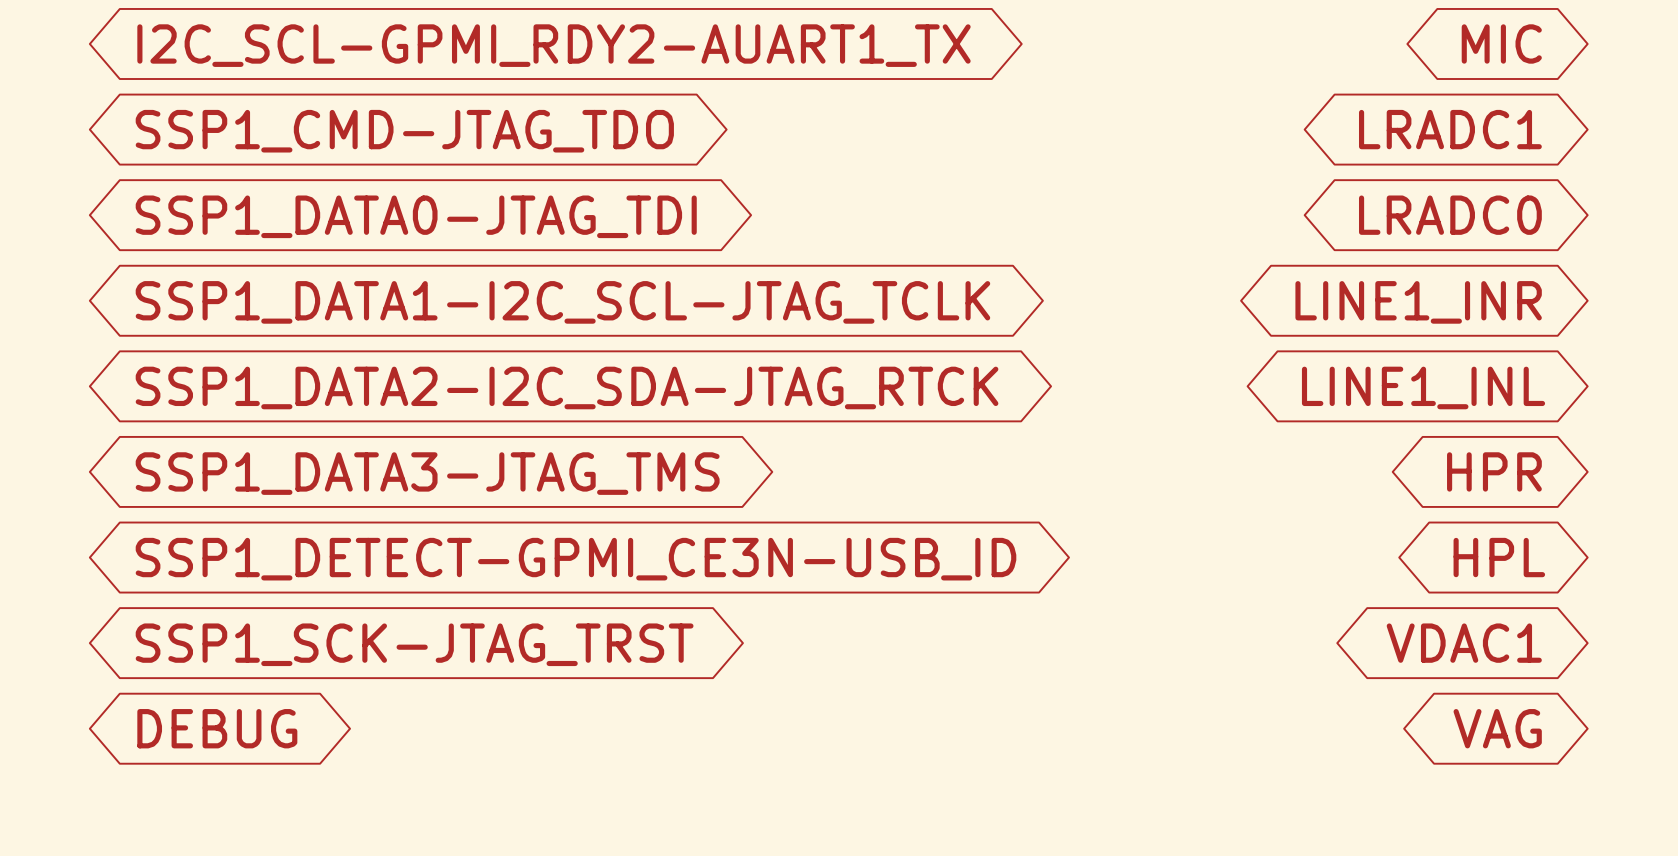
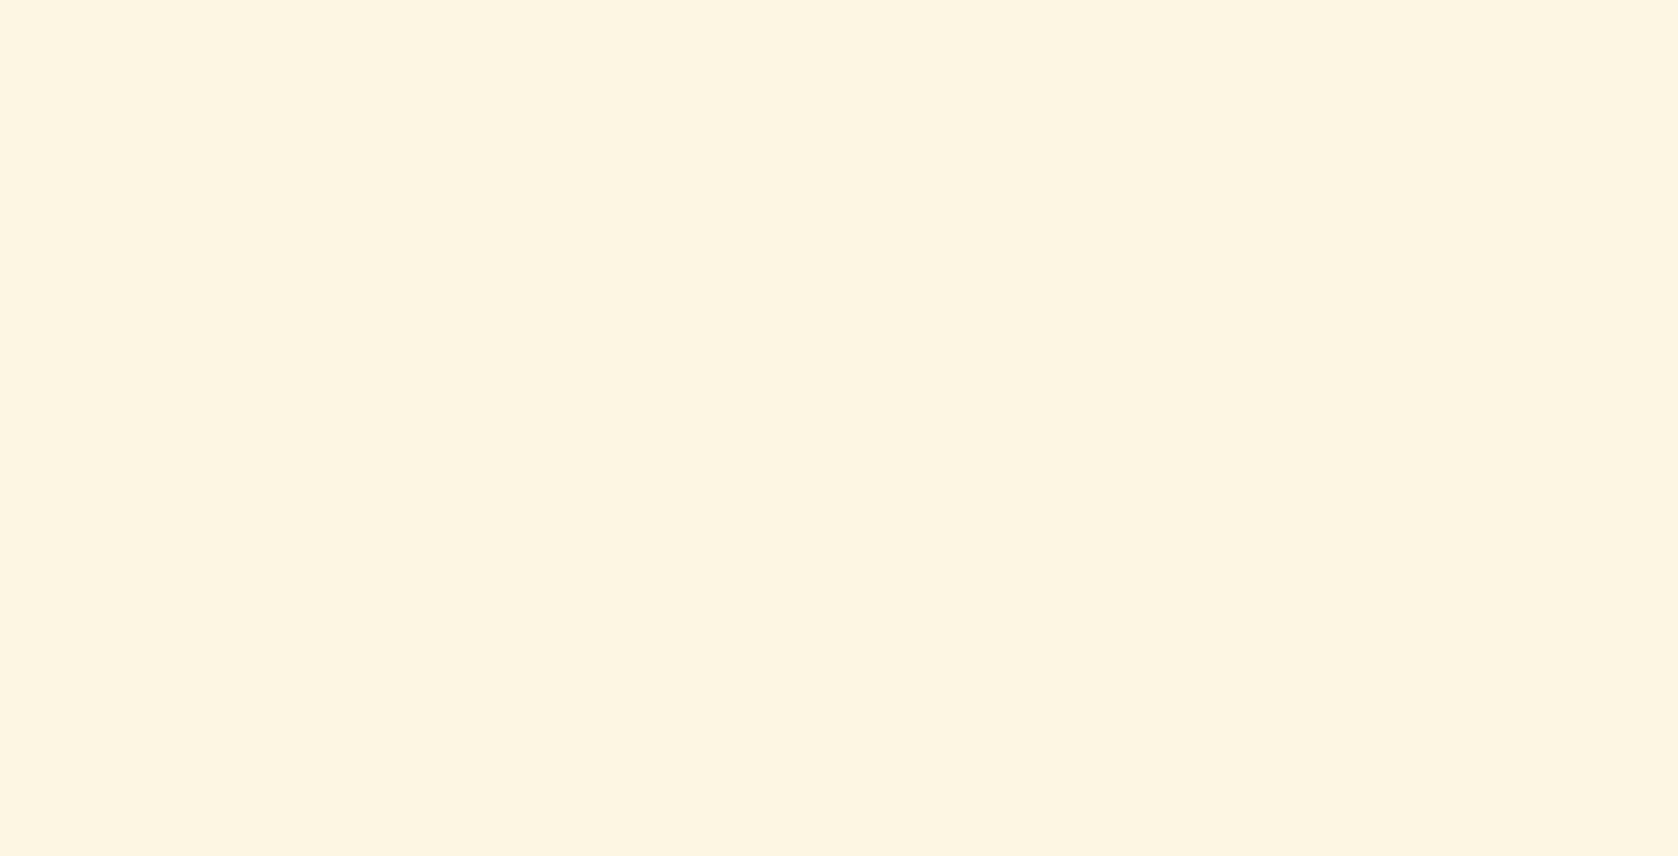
global label: MIC (1501, 43) -> none
global label: I2C_SCL-GPMI_RDY2-AUART1_TX (553, 45) -> none
global label: LRADC1 (1450, 129) -> none
global label: SSP1_CMD-JTAG_TDO (404, 131) -> none
global label: LRADC0 (1450, 215) -> none
global label: SSP1_DATA0-JTAG_TDI (416, 216) -> none
global label: SSP1_DATA1-I2C_SCL-JTAG_TCLK (562, 302) -> none
global label: LINE1_INR (1418, 302) -> none
global label: SSP1_DATA2-I2C_SDA-JTAG_RTCK (567, 387) -> none
global label: LINE1_INL (1423, 387) -> none
global label: HPR (1494, 471) -> none
global label: SSP1_DATA3-JTAG_TMS (427, 473) -> none
global label: HPL (1499, 557) -> none
global label: SSP1_DETECT-GPMI_CE3N-USB_ID (575, 559) -> none
global label: VDAC1 (1464, 643) -> none
global label: SSP1_SCK-JTAG_TRST (414, 644) -> none
global label: DEBUG (217, 728) -> none
global label: VAG (1497, 728) -> none

